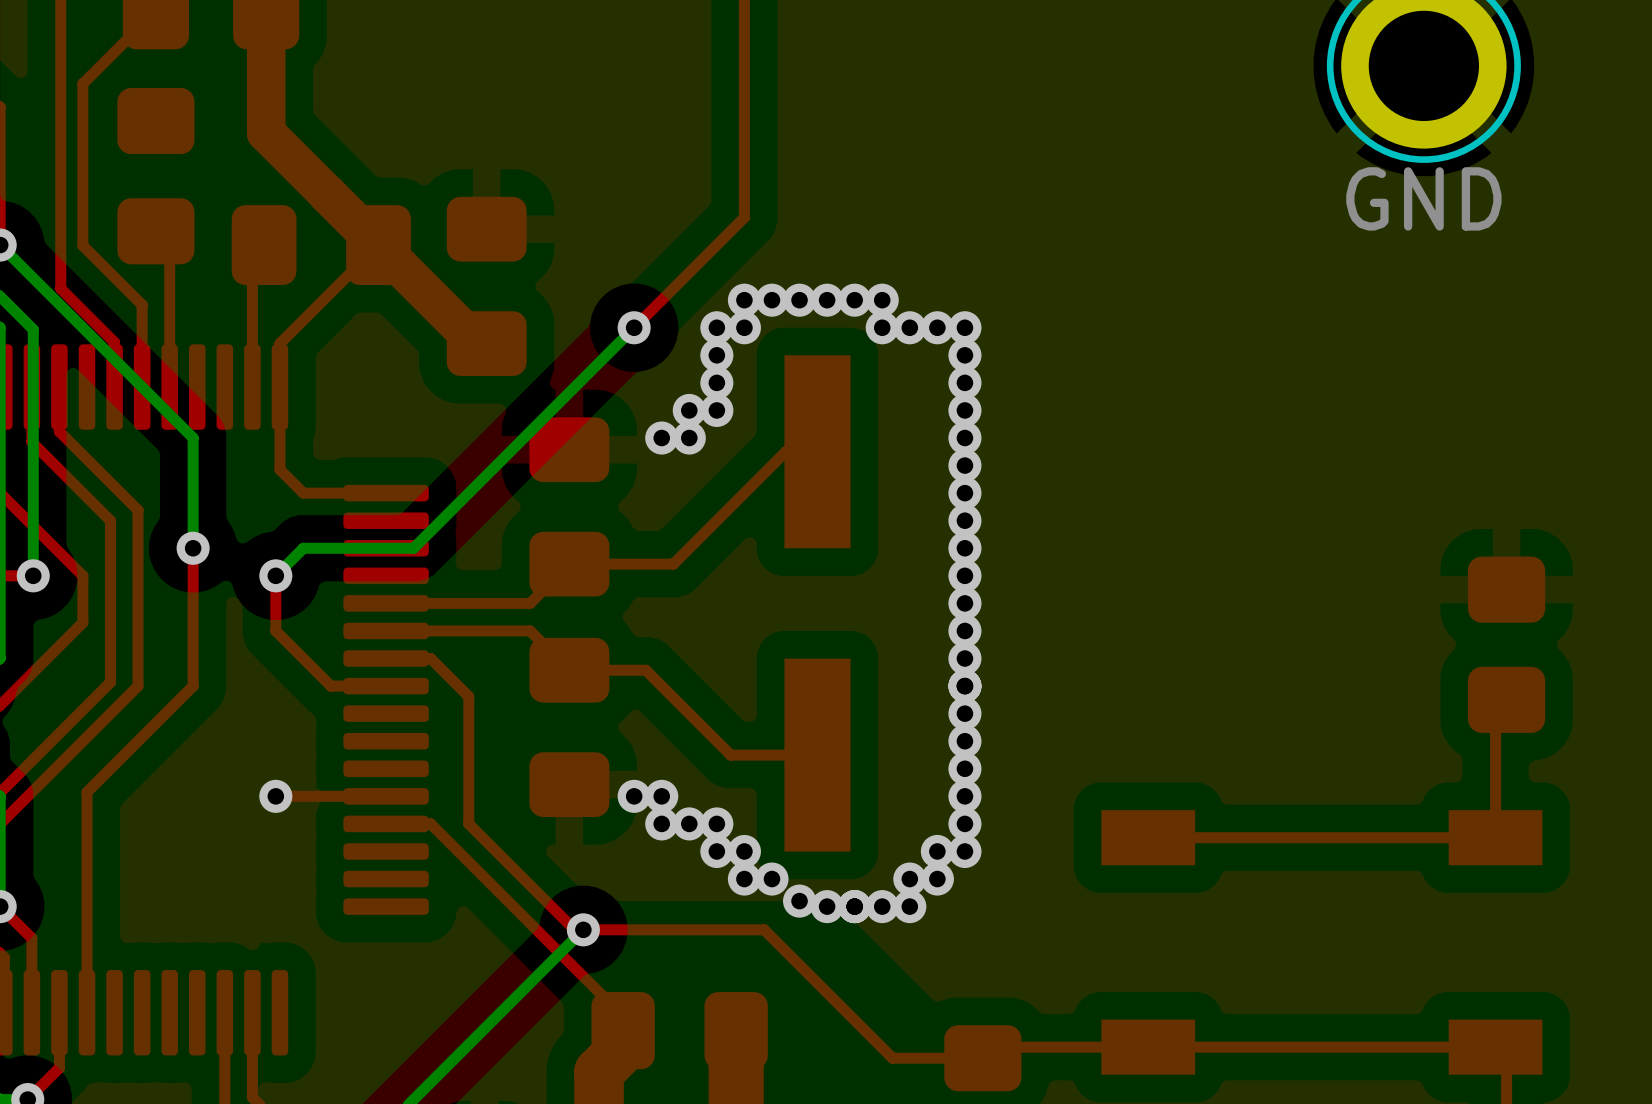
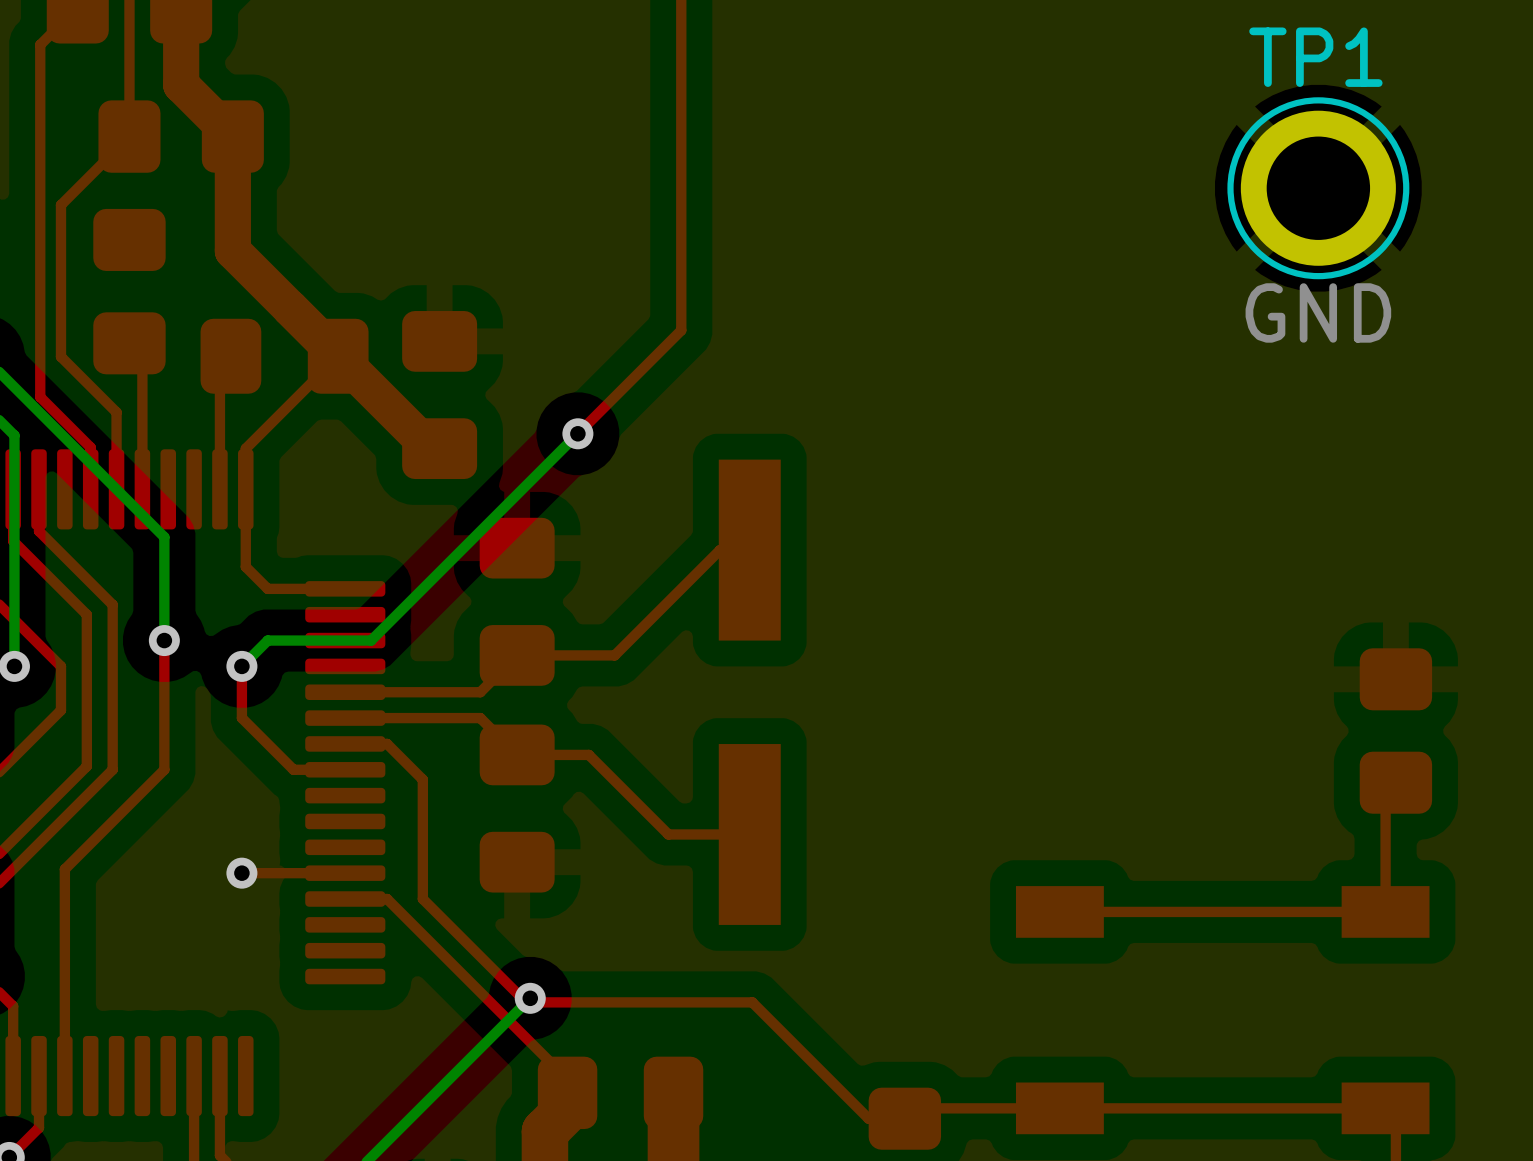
via: (744, 300) -> none
via: (771, 300) -> none
via: (799, 300) -> none
via: (827, 300) -> none
via: (854, 300) -> none
via: (882, 300) -> none
via: (716, 327) -> none
via: (744, 327) -> none
via: (882, 327) -> none
via: (909, 327) -> none
via: (937, 327) -> none
via: (964, 327) -> none
via: (716, 355) -> none
via: (964, 355) -> none
via: (716, 382) -> none
via: (964, 382) -> none
via: (689, 410) -> none
via: (716, 410) -> none
via: (964, 410) -> none
via: (661, 438) -> none
via: (689, 438) -> none
via: (964, 438) -> none
via: (964, 465) -> none
via: (964, 493) -> none
via: (964, 520) -> none
via: (964, 548) -> none
via: (964, 575) -> none
via: (964, 603) -> none
via: (964, 630) -> none
via: (964, 658) -> none
via: (964, 686) -> none
via: (964, 713) -> none
via: (964, 741) -> none
via: (964, 768) -> none
via: (634, 796) -> none
via: (661, 796) -> none
via: (964, 796) -> none
via: (661, 823) -> none
via: (689, 823) -> none
via: (716, 823) -> none
via: (964, 823) -> none
via: (716, 851) -> none
via: (744, 851) -> none
via: (937, 851) -> none
via: (964, 851) -> none
via: (744, 879) -> none
via: (771, 879) -> none
via: (909, 879) -> none
via: (937, 879) -> none
via: (799, 901) -> none
via: (827, 906) -> none
via: (854, 906) -> none
via: (882, 906) -> none
via: (909, 906) -> none
top track: (574, 929) (764, 929) (892, 1058) (944, 1058) -> (522, 998) (526, 1002) (752, 1002) (868, 1118)

